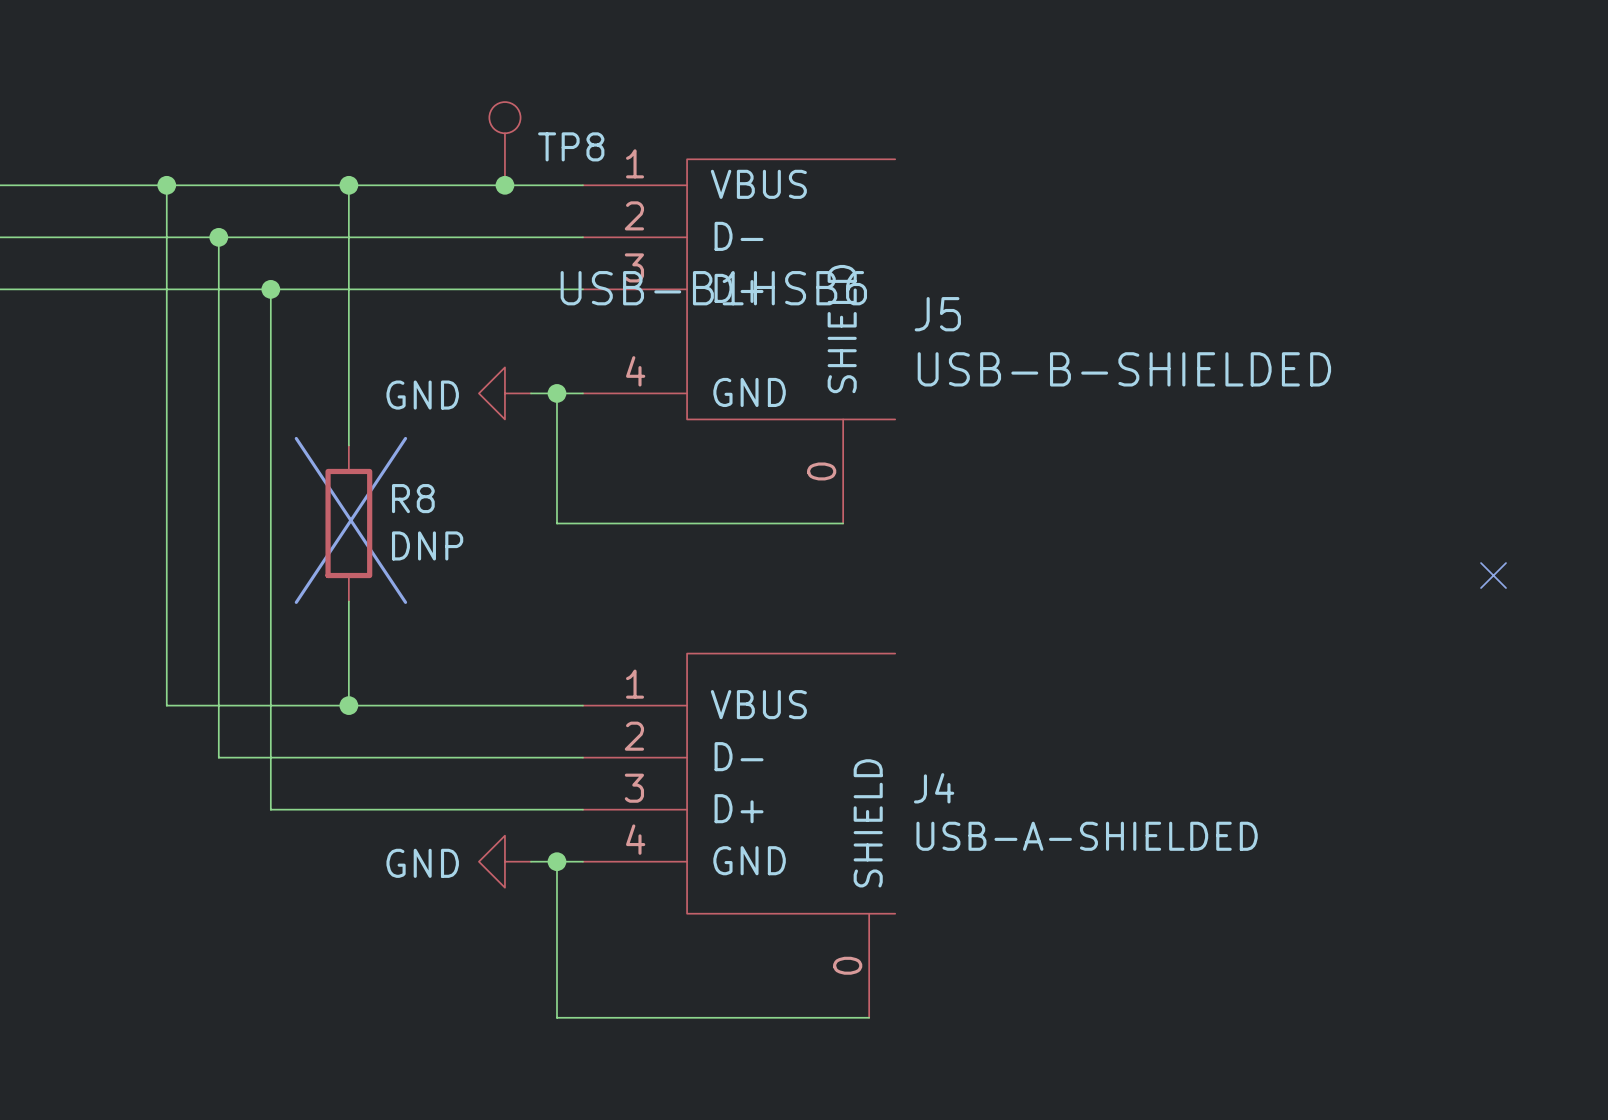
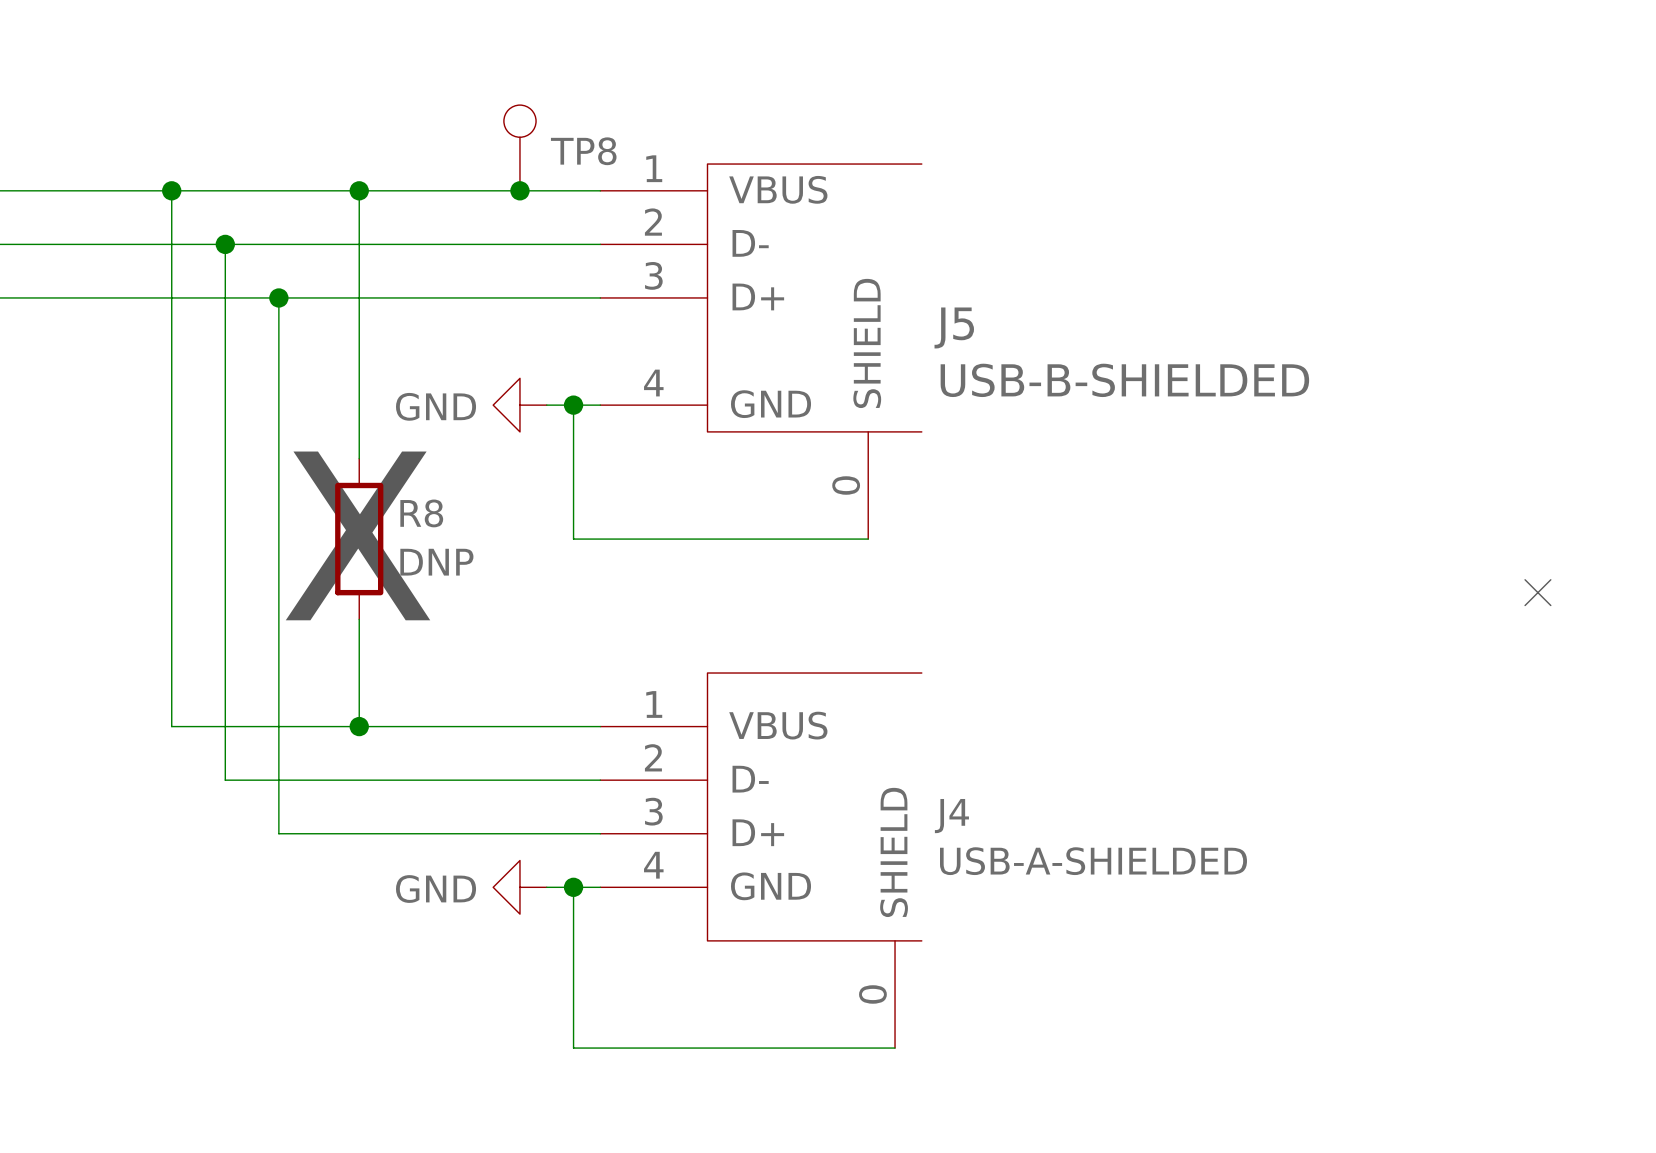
J5 text: USB-B1HSB6 (713, 288) -> none

